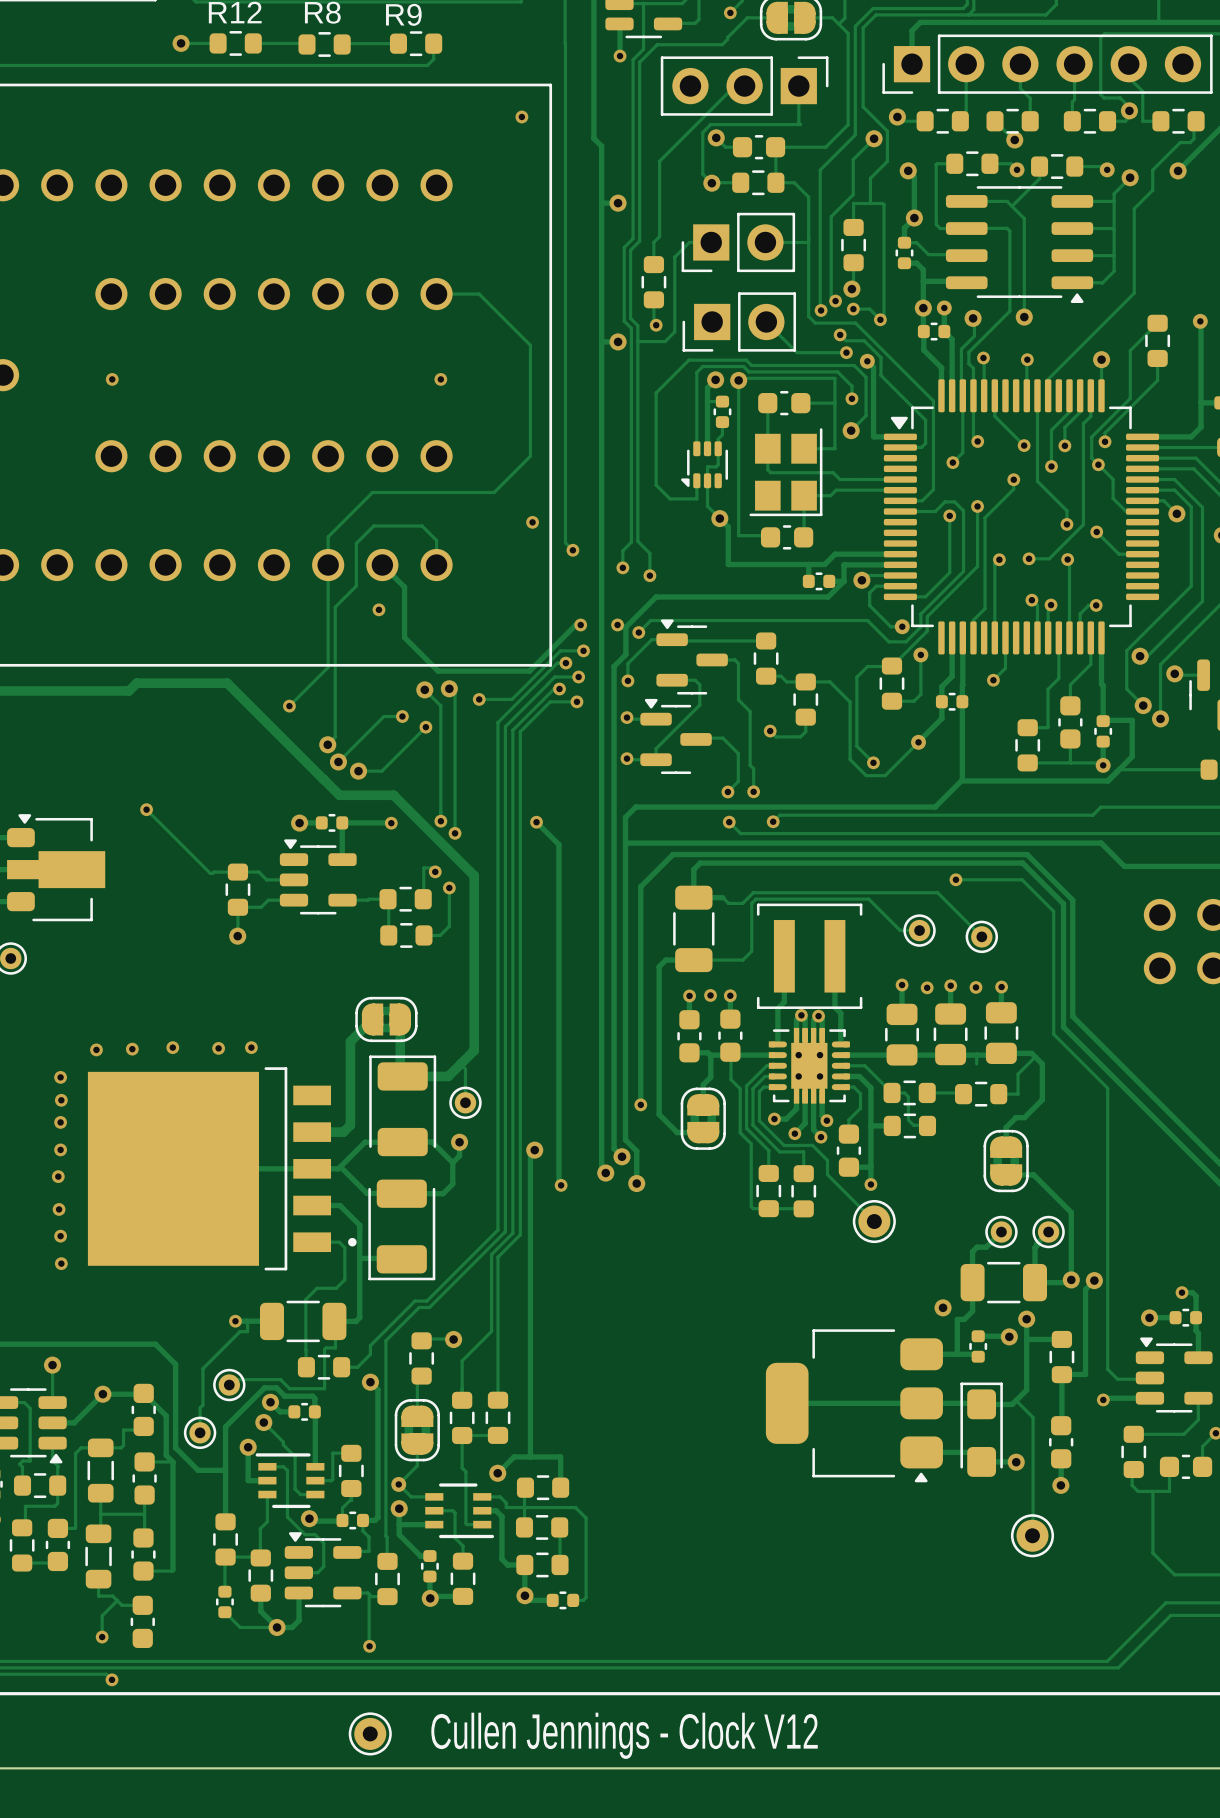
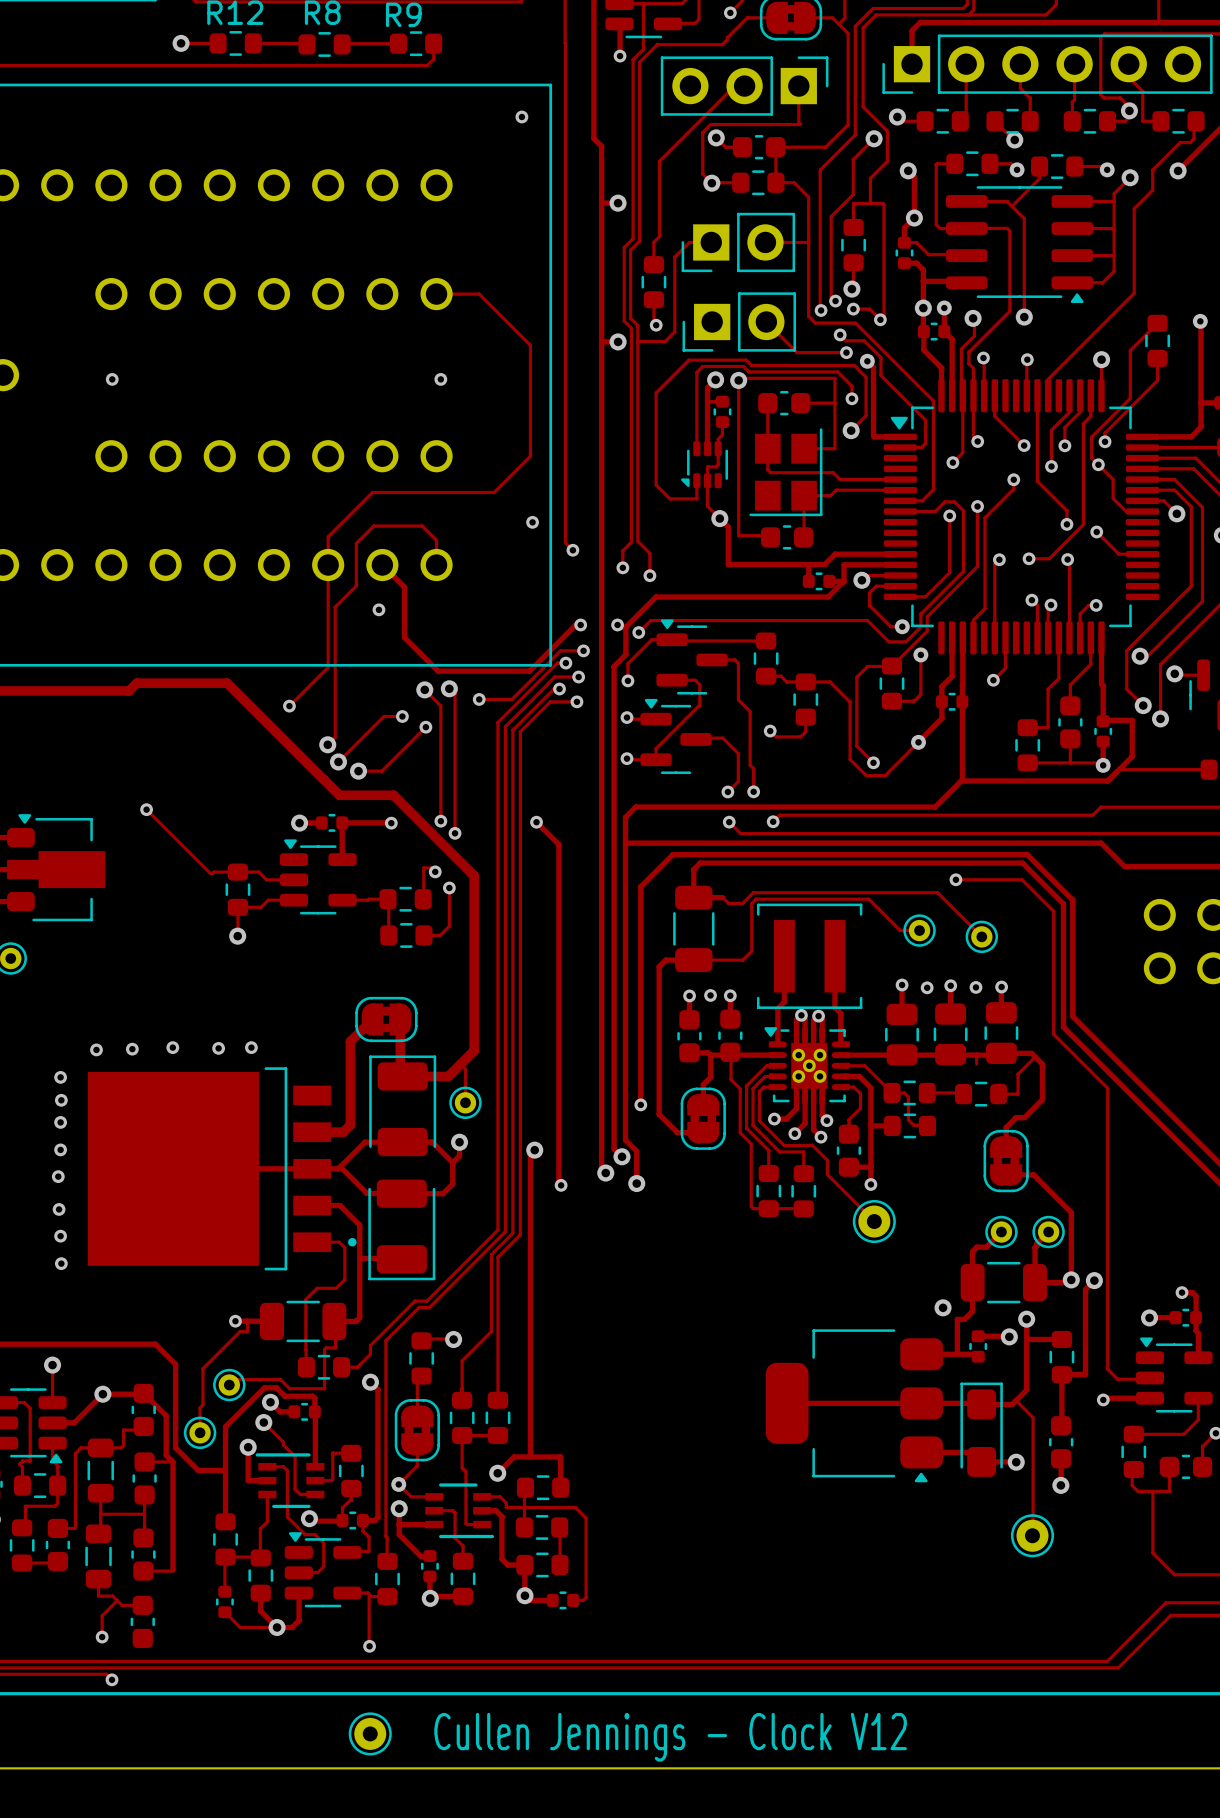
part footprint: [768, 1027, 850, 1104] -> [764, 1027, 850, 1104]

